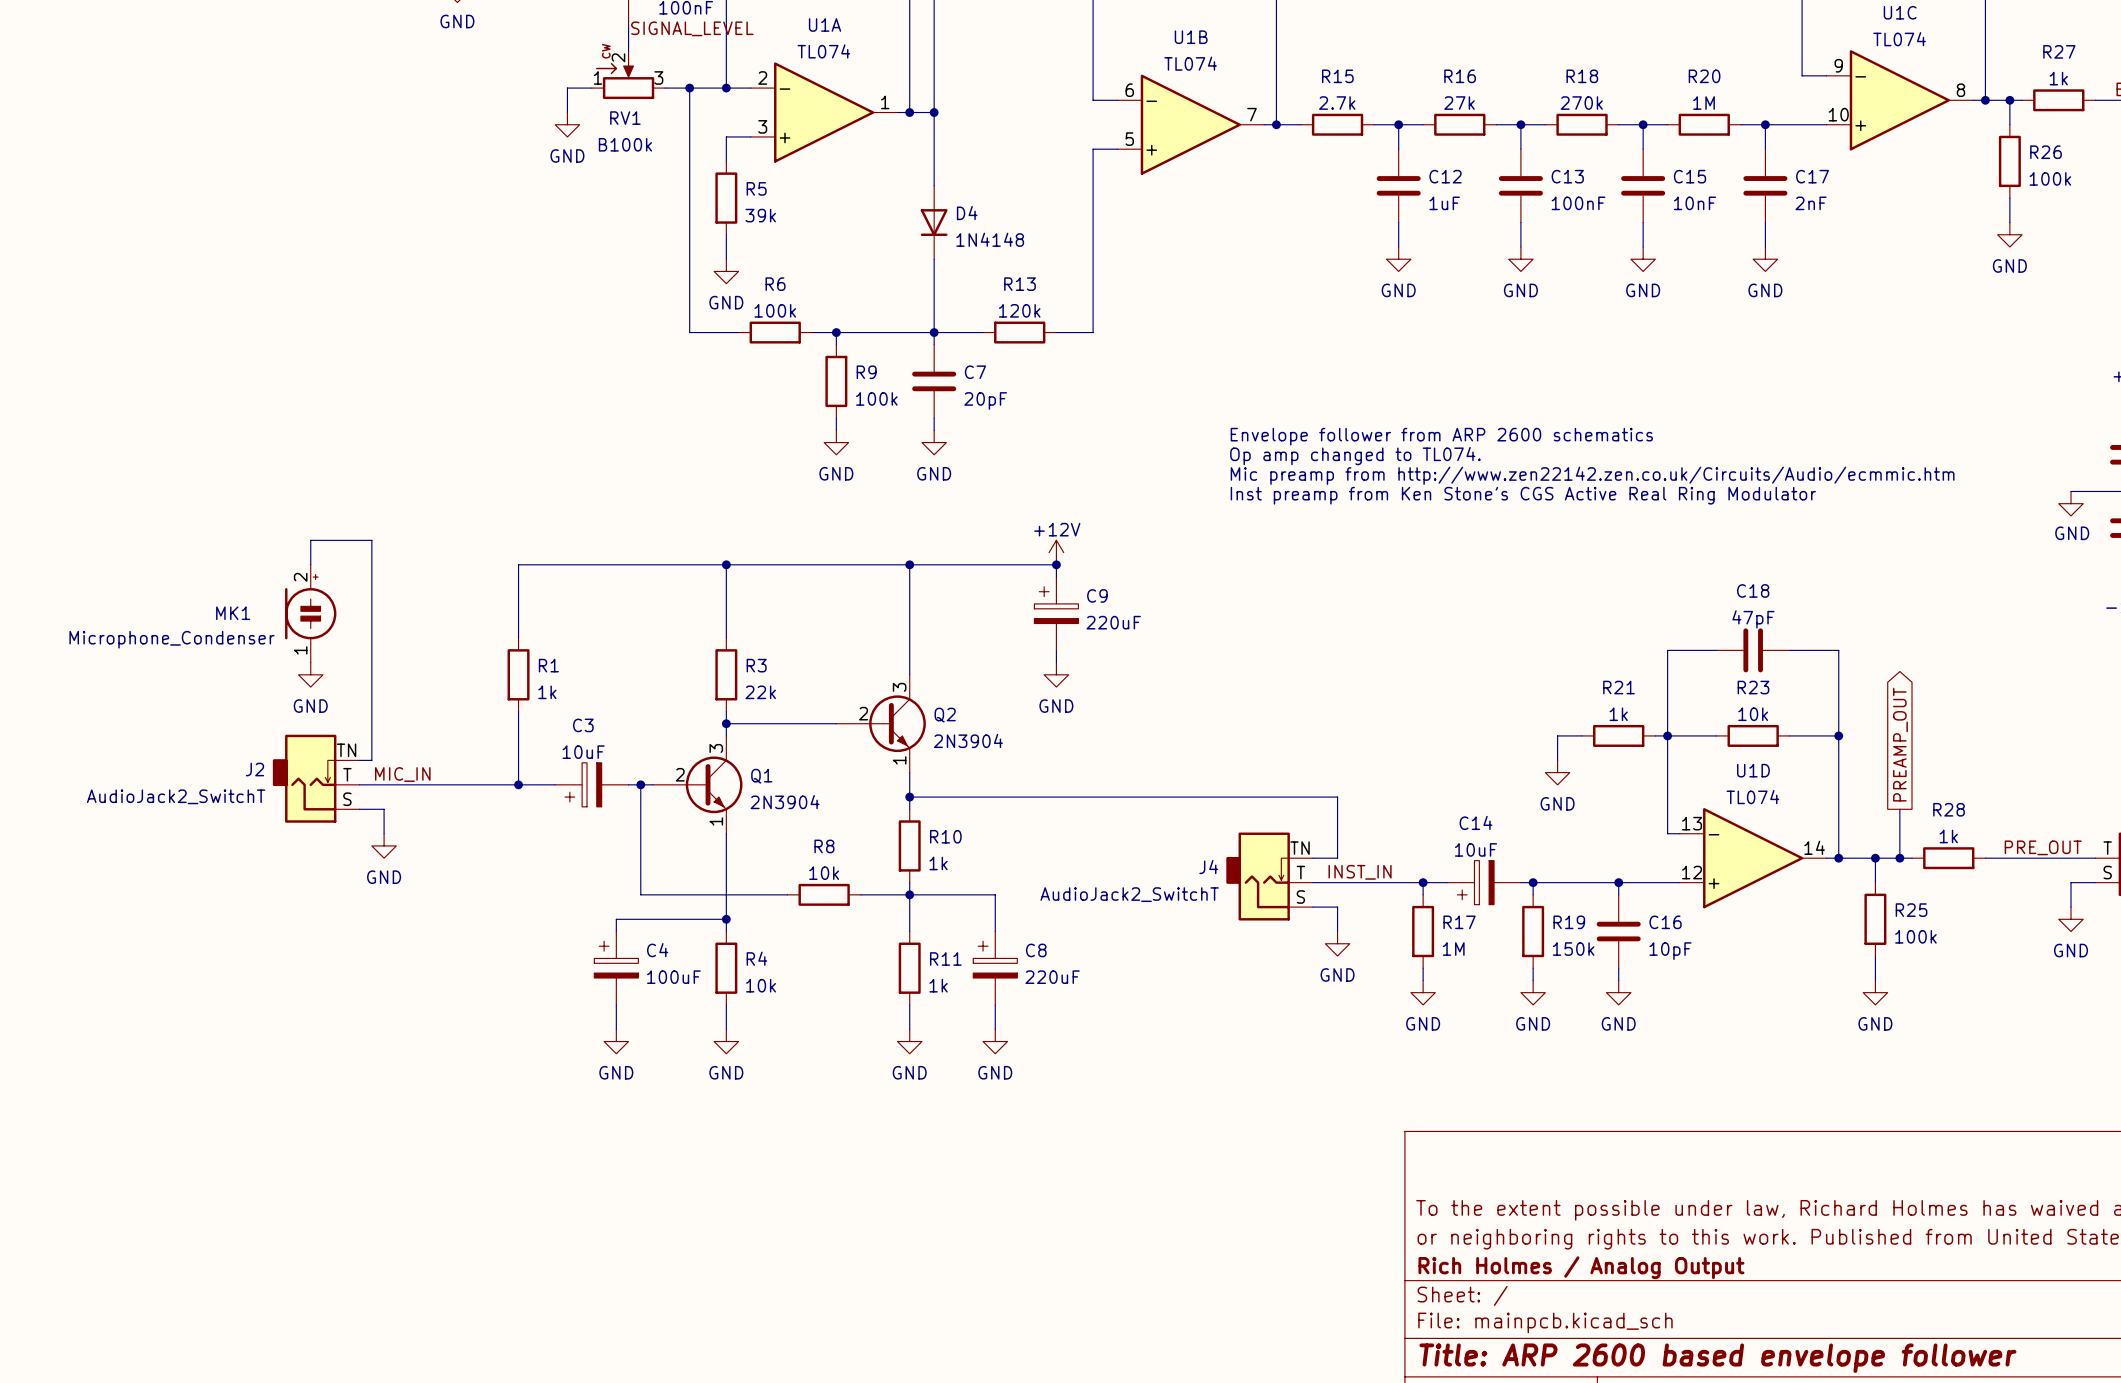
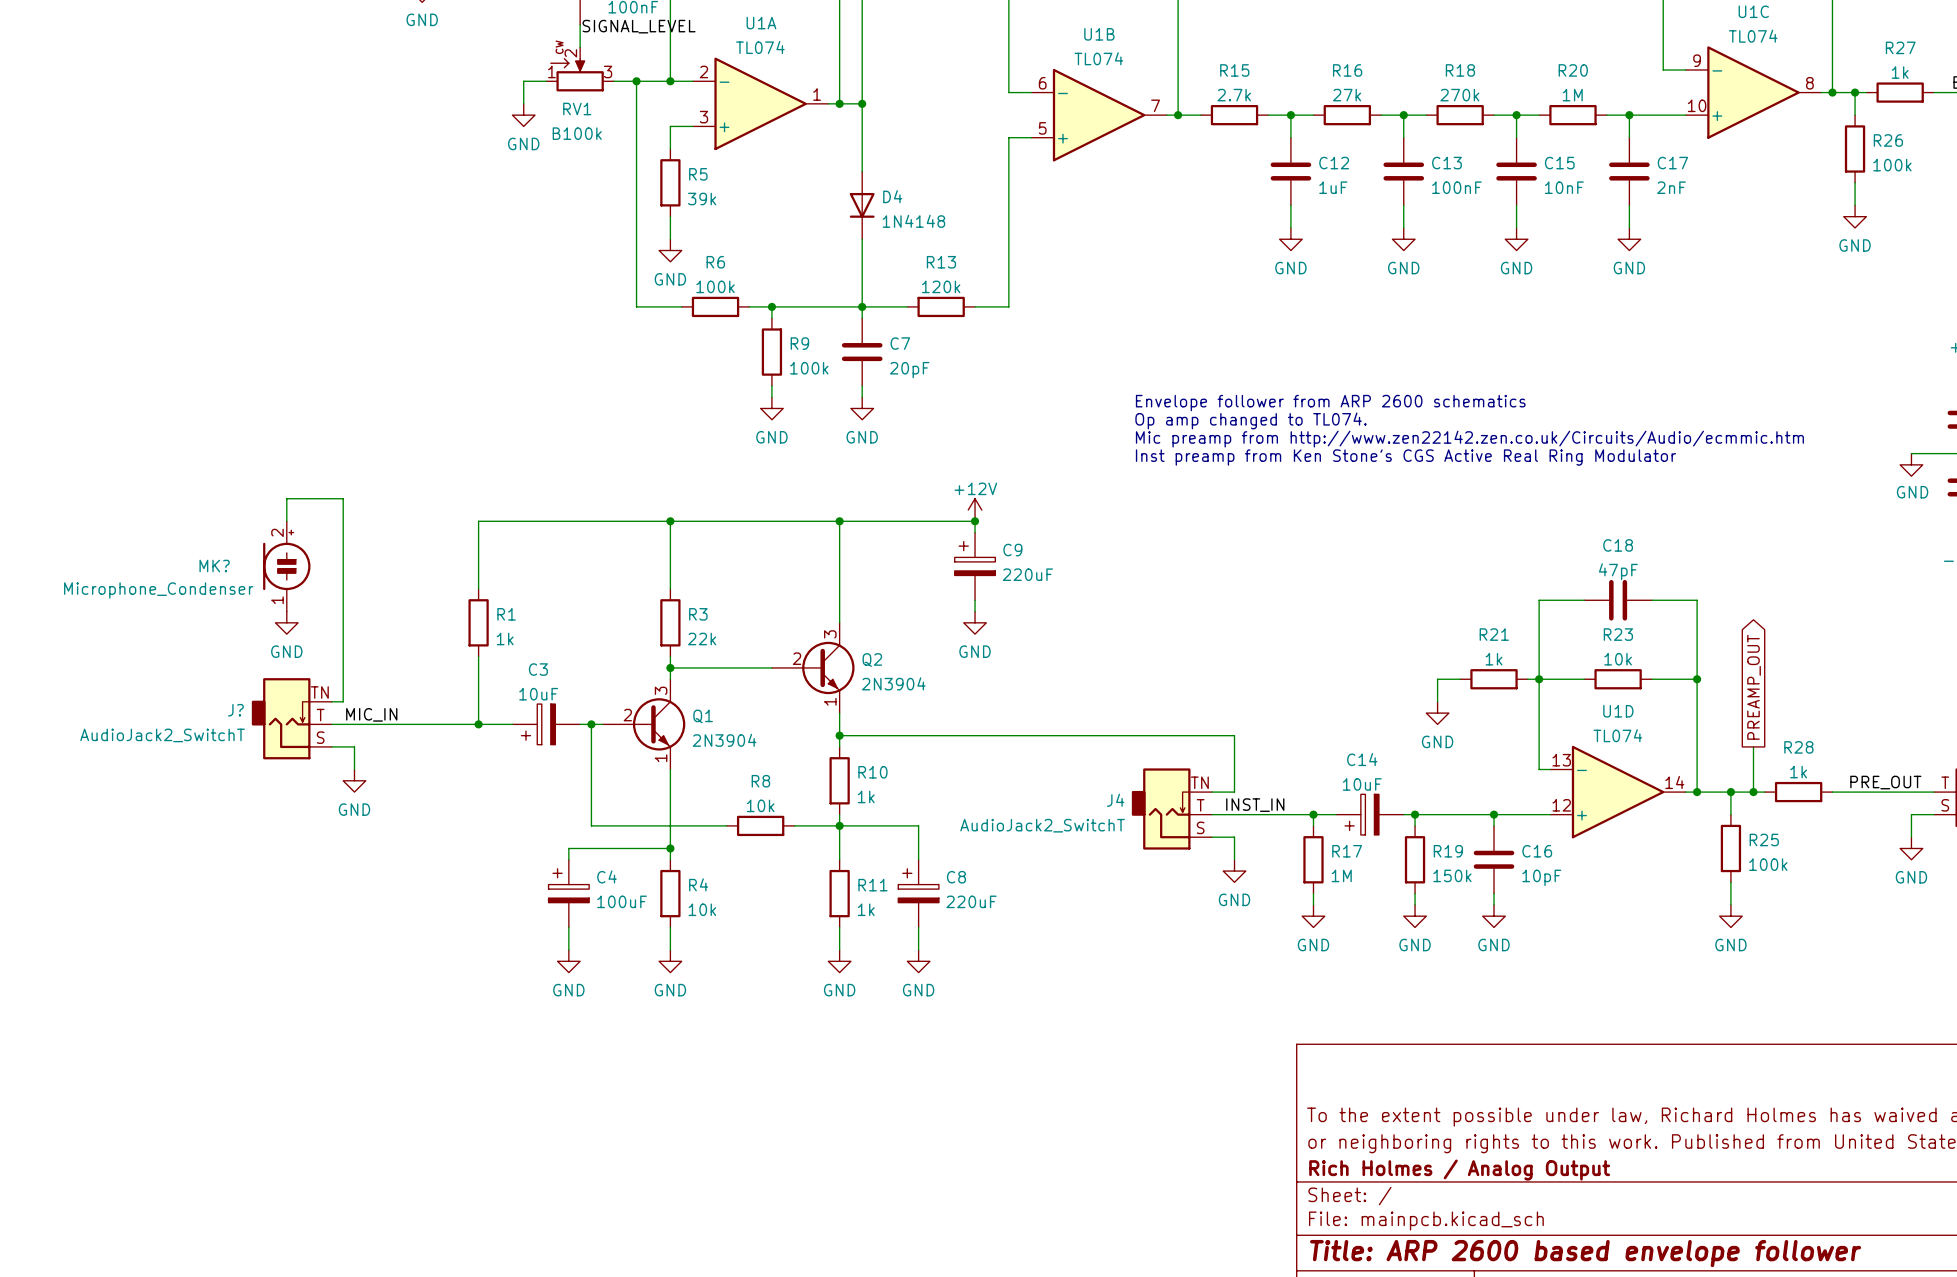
MK1 name: MK1 (233, 613) -> MK? (214, 566)
J2 name: J2 (254, 769) -> J? (235, 710)

